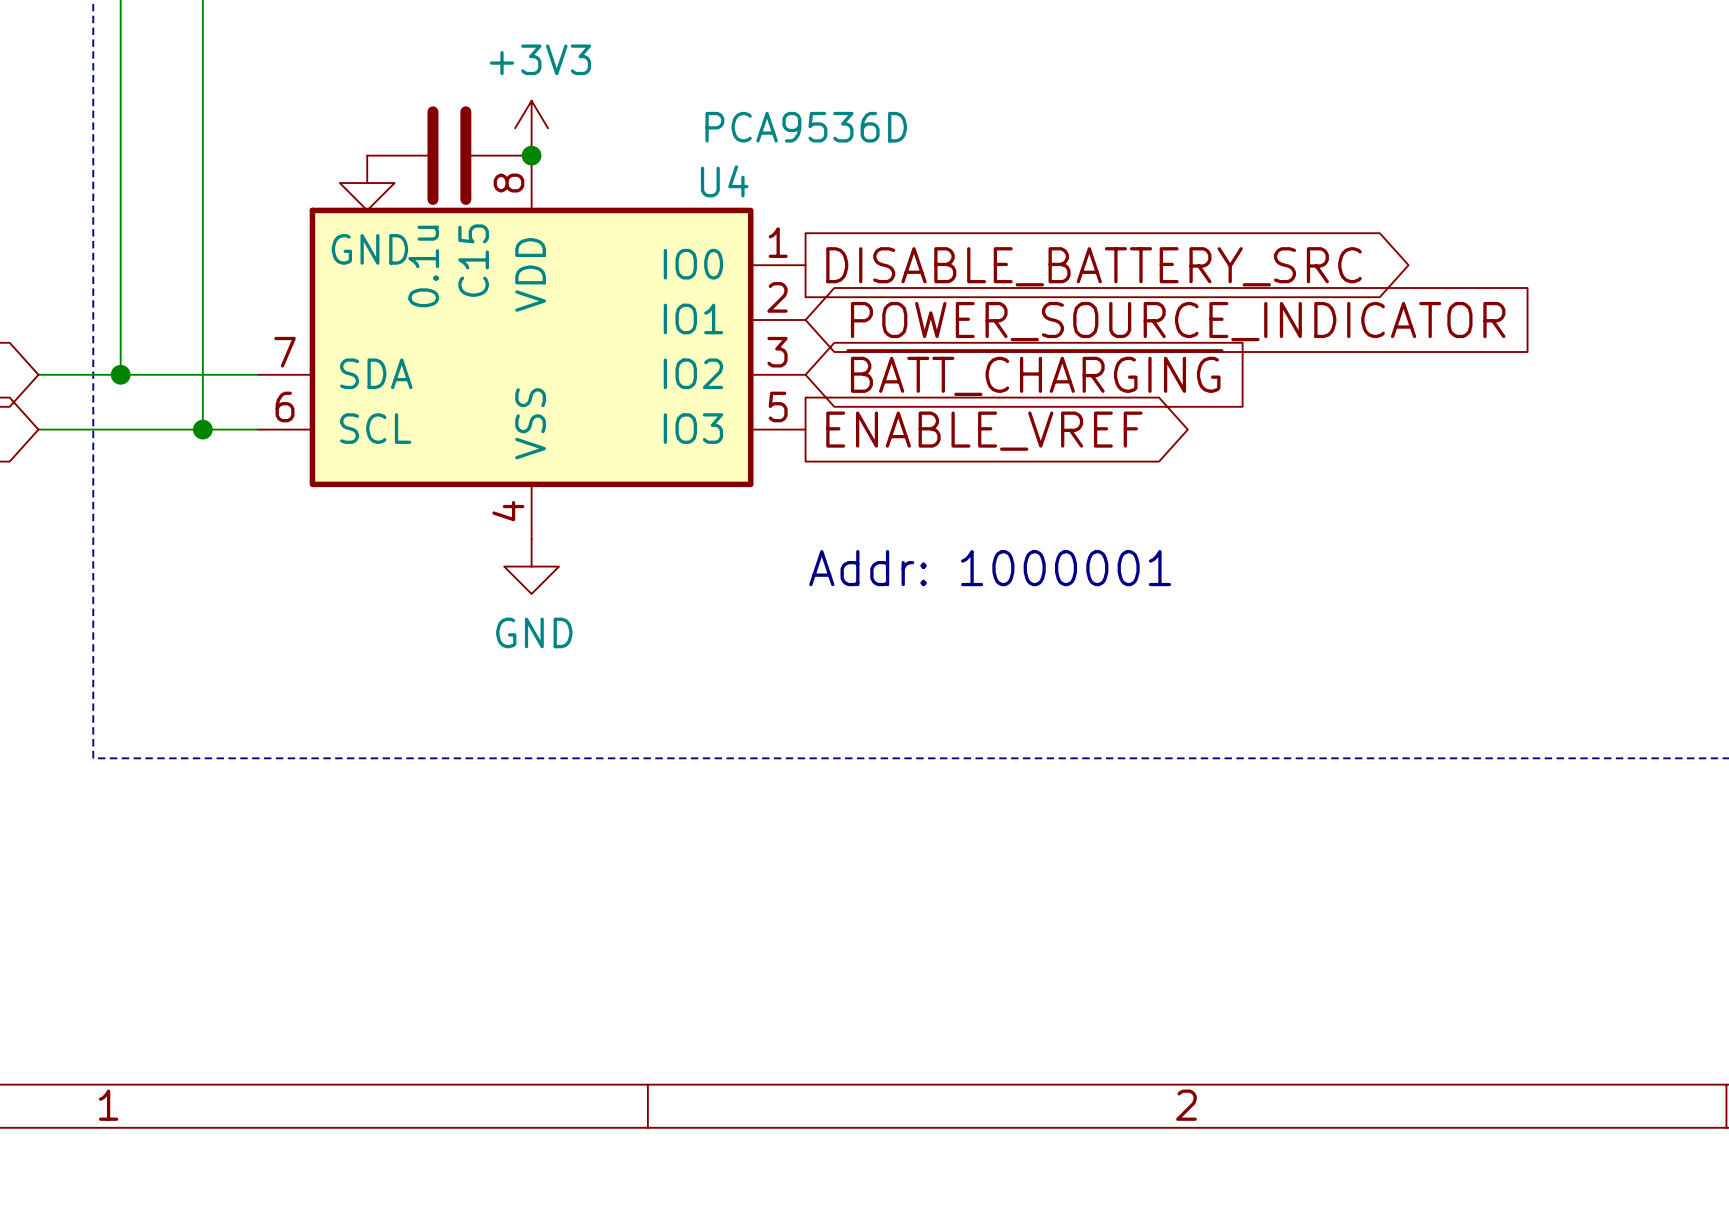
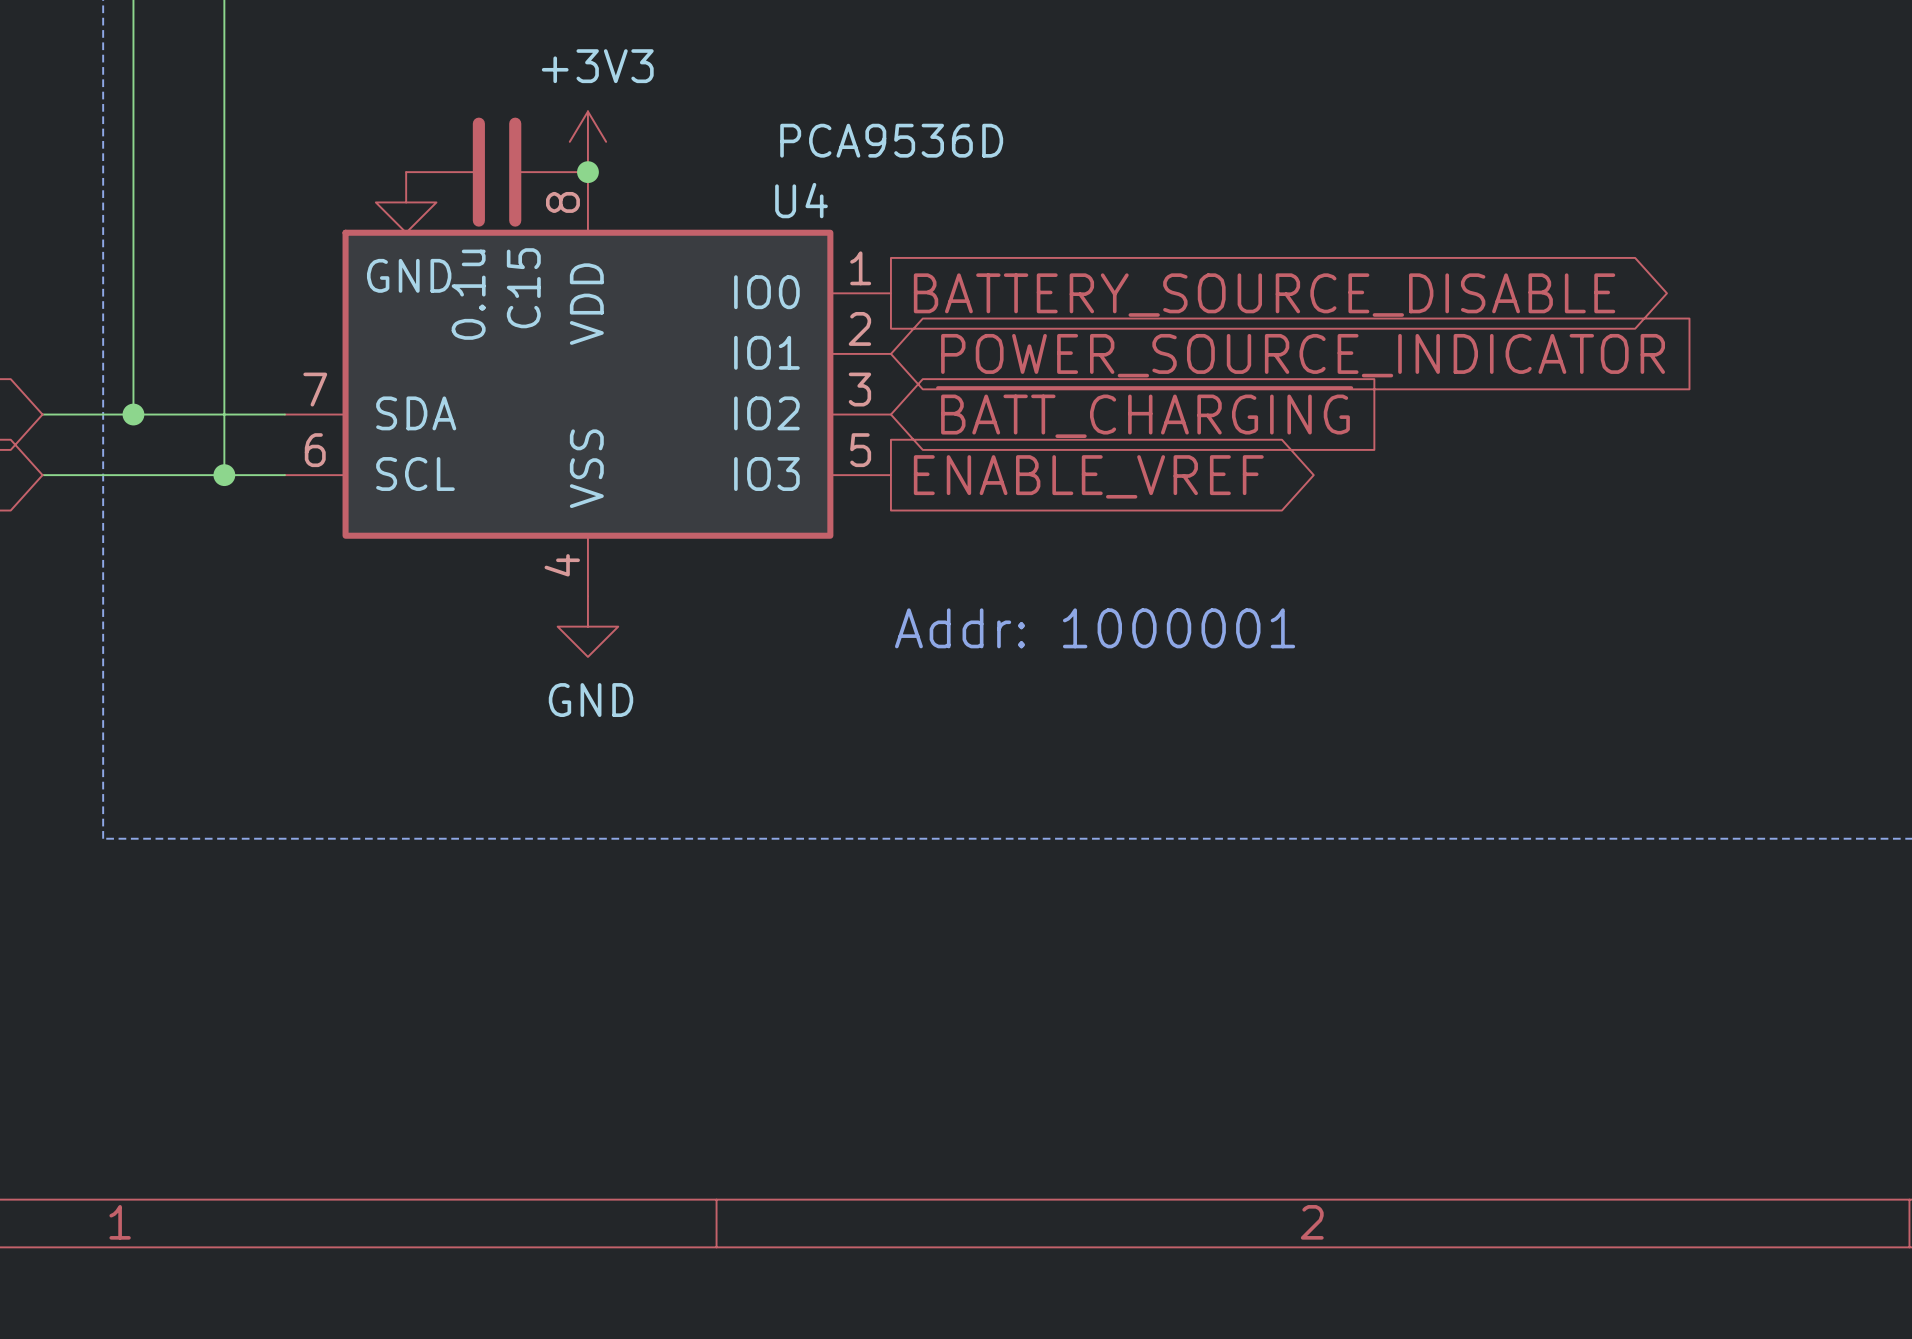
global label: DISABLE_BATTERY_SRC (1094, 266) -> BATTERY_SOURCE_DISABLE (1264, 295)

